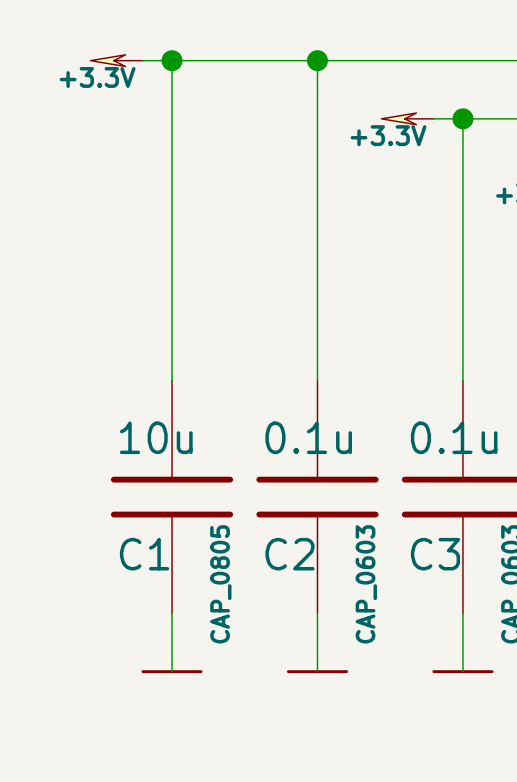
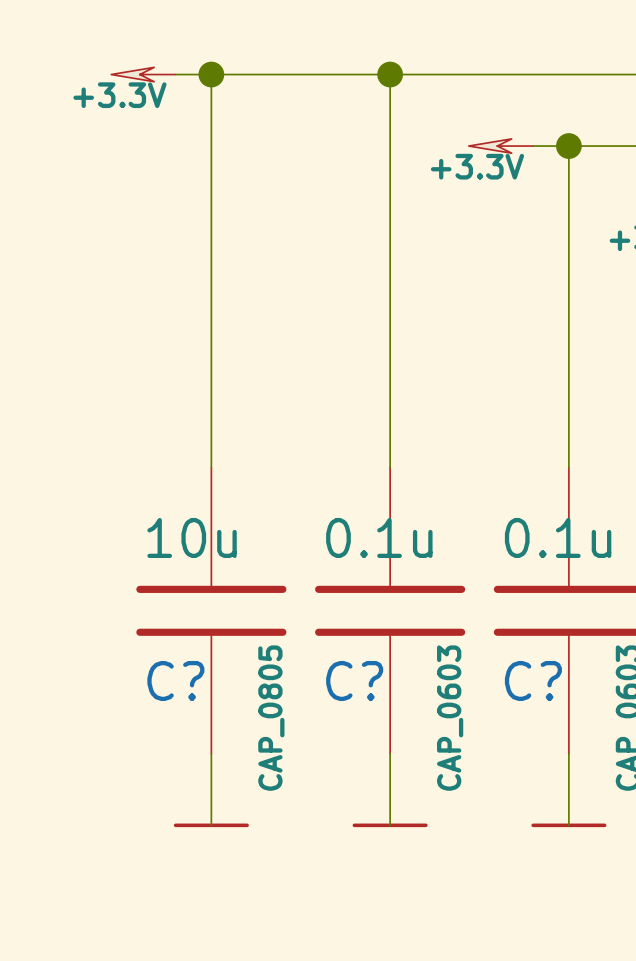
C1 name: C1 (144, 554) -> C? (175, 680)
C2 name: C2 (289, 554) -> C? (354, 680)
C3 name: C3 (435, 554) -> C? (533, 680)

